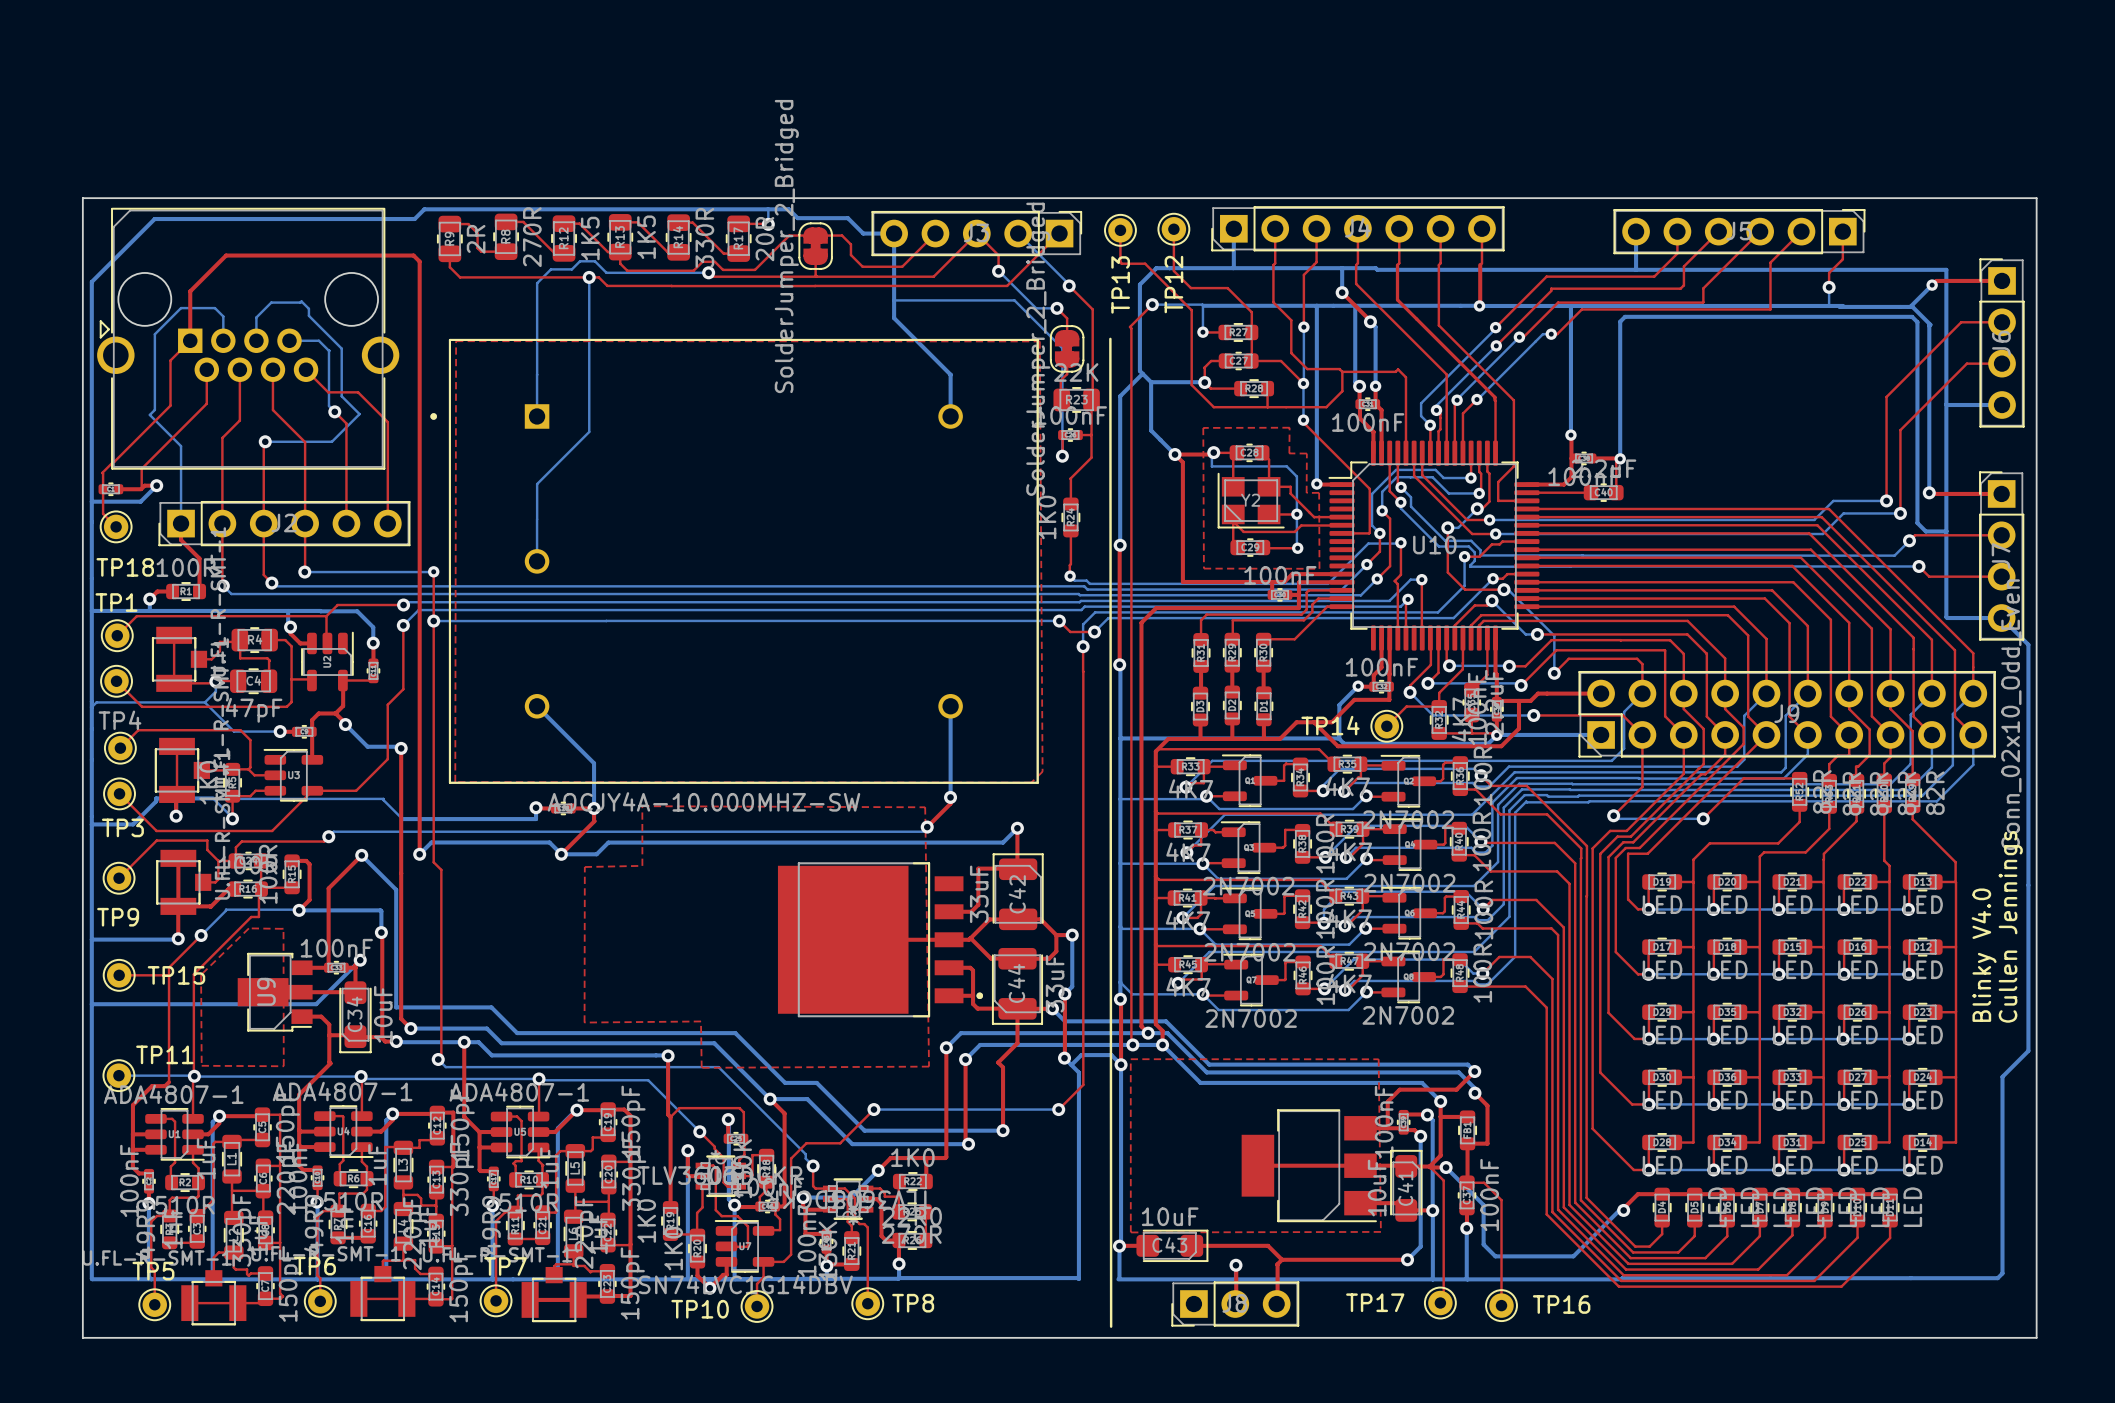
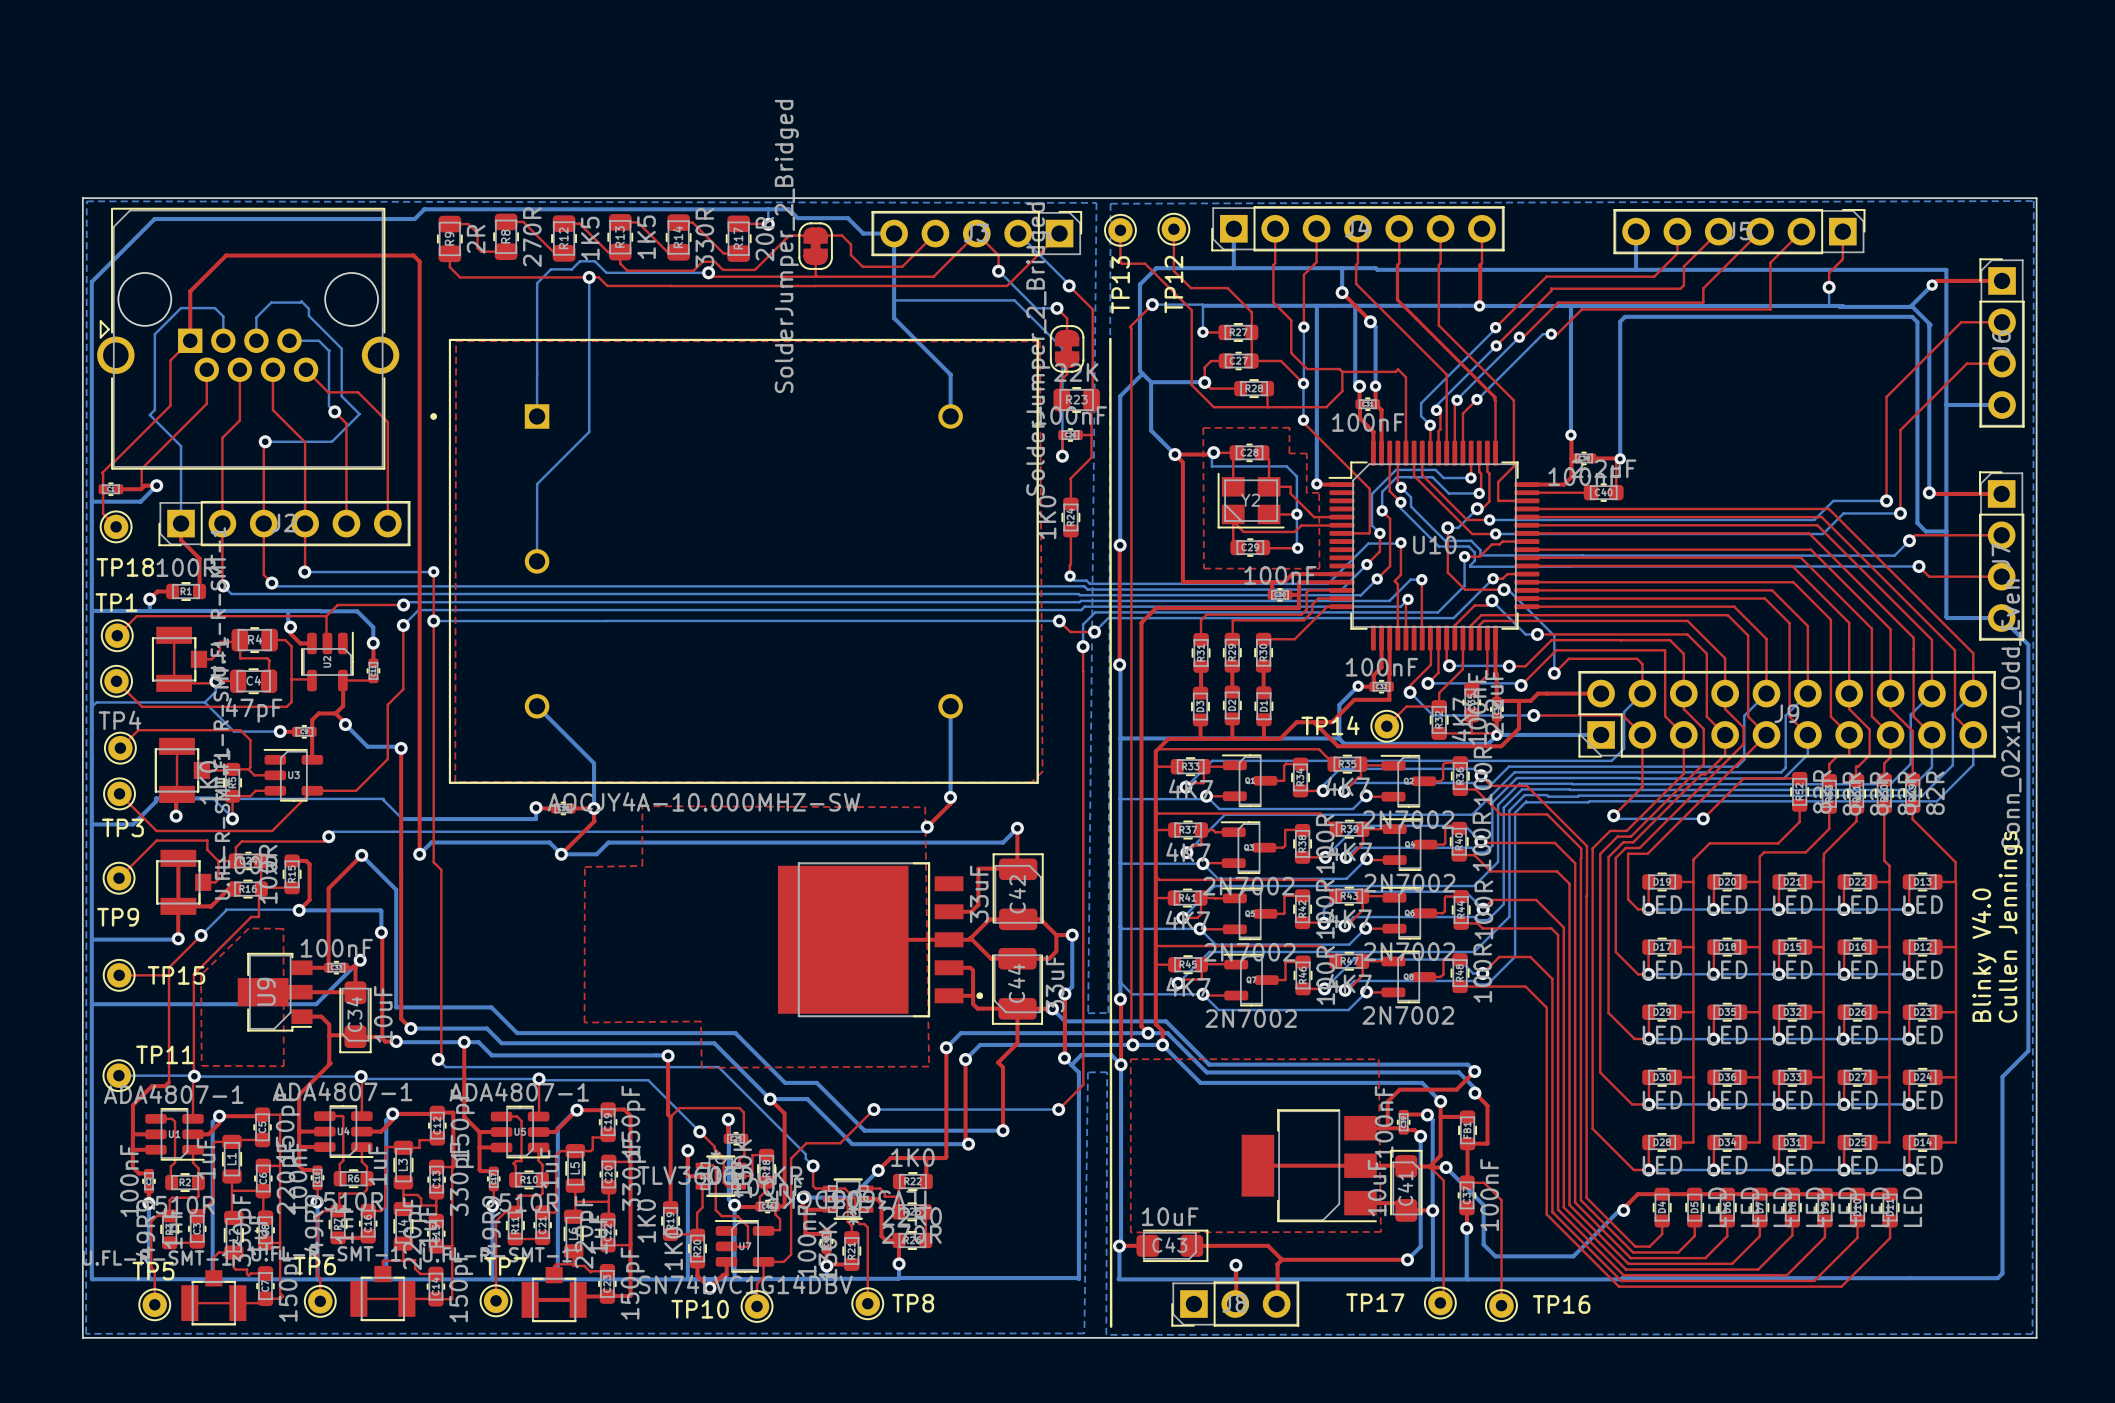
bottom zone outline: none -> (2033, 201) (1110, 203) (1108, 1012) (1088, 1013) (1096, 202) (86, 201) (86, 1333) (1084, 1333) (1087, 1072) (1107, 1072) (1106, 1334) (2032, 1334) (2033, 201)

